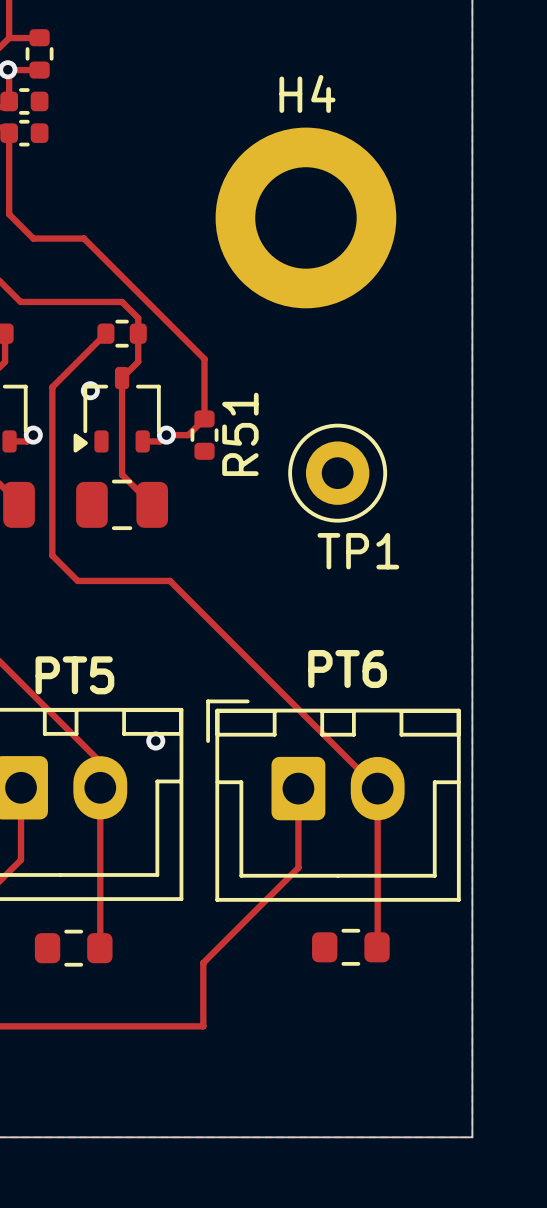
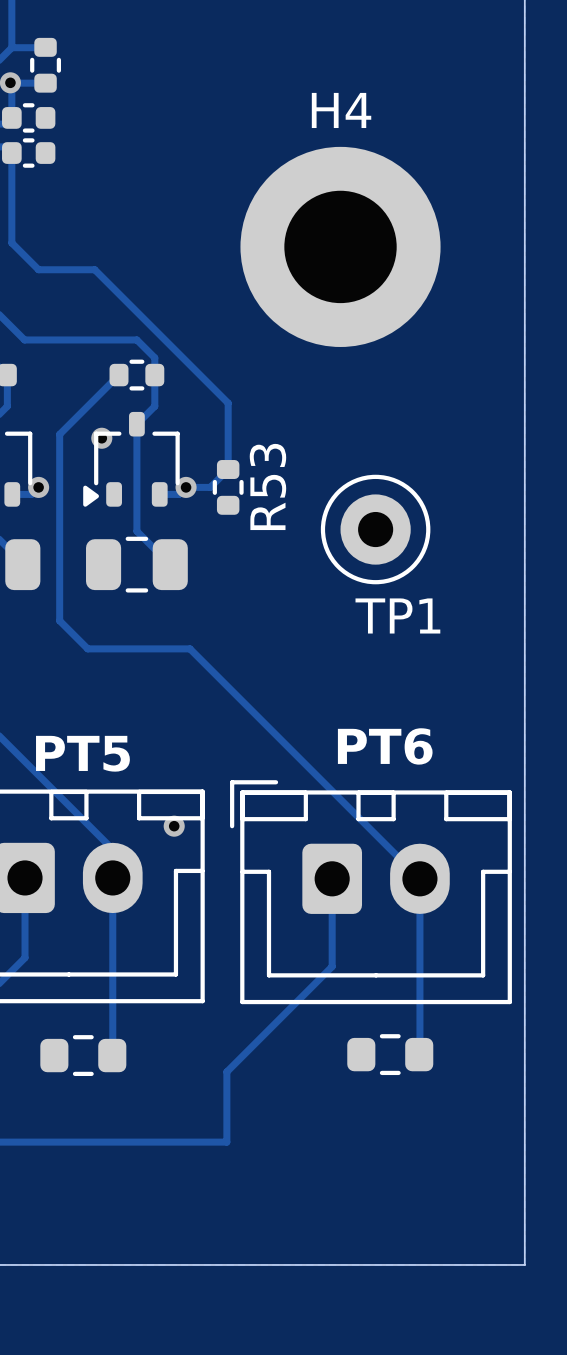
R51 name: R51 (240, 434) -> R53 (267, 486)

